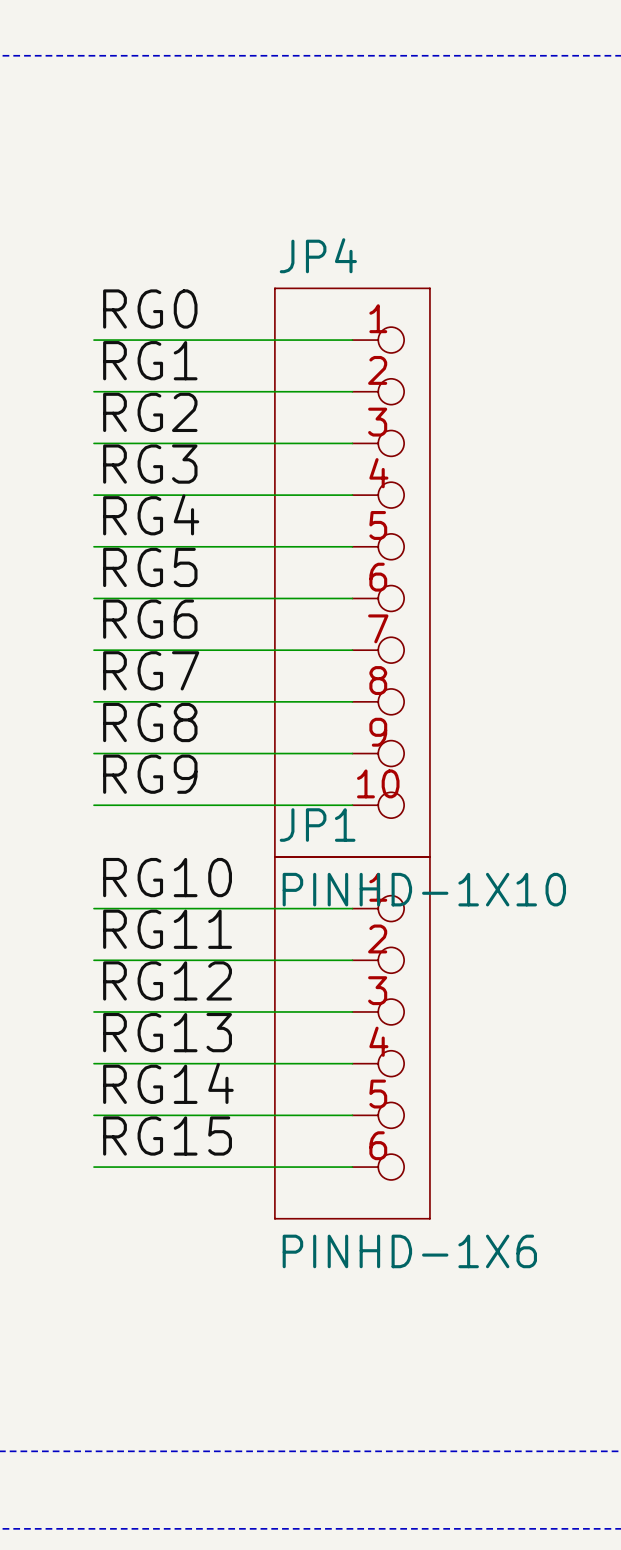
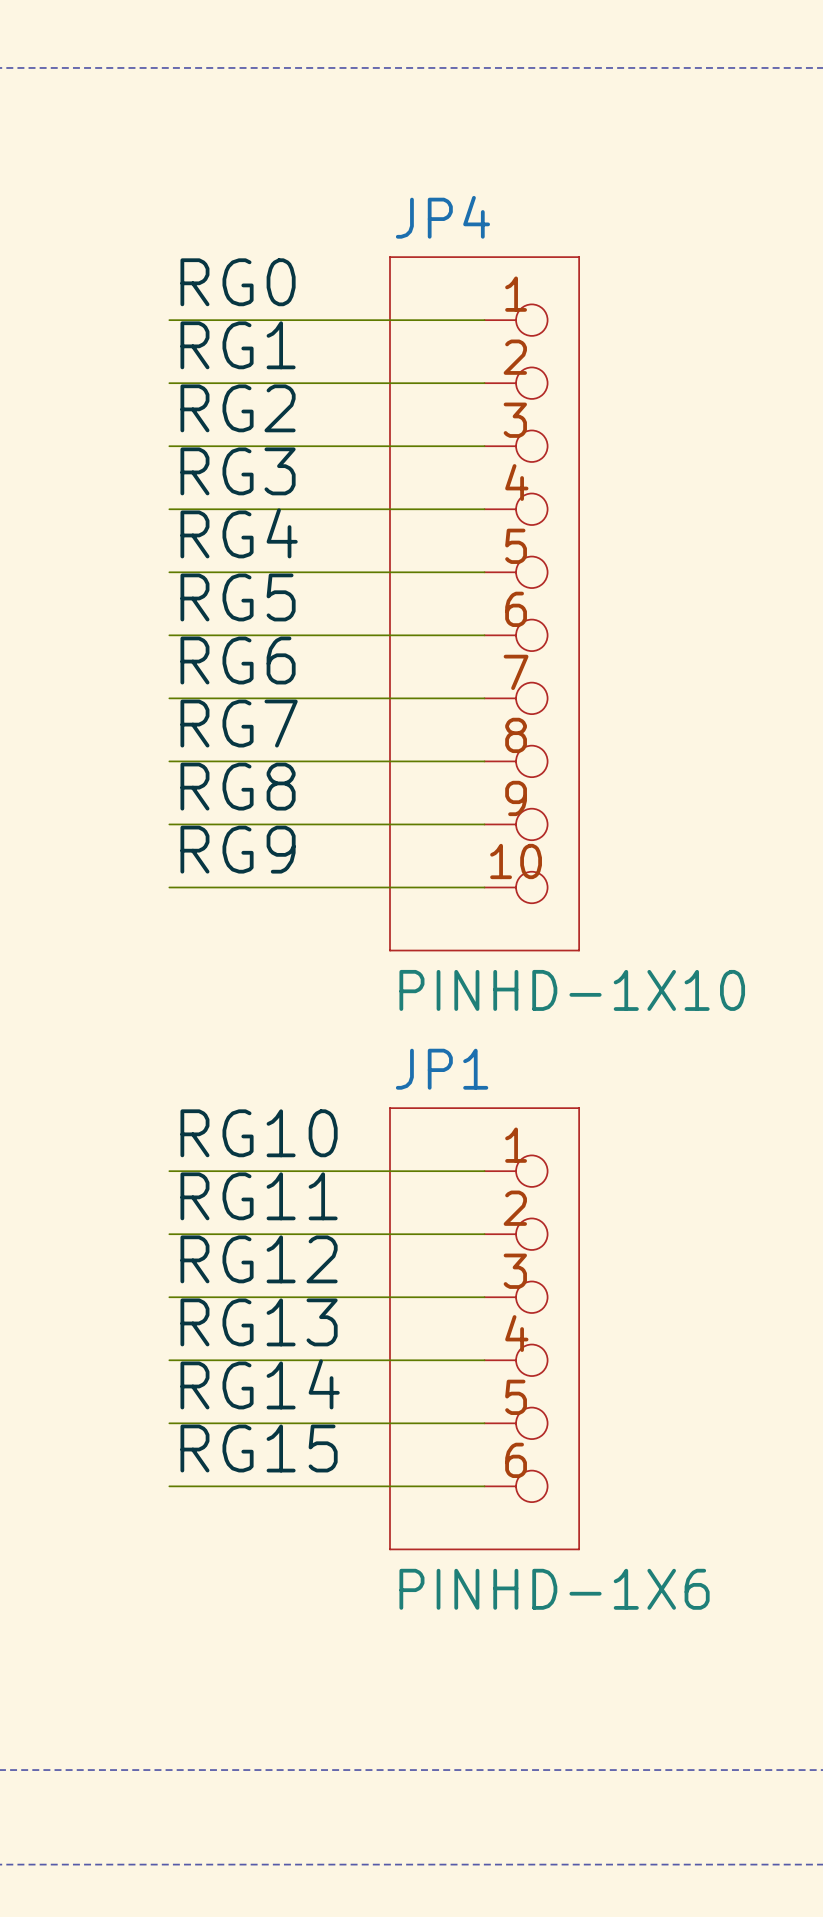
label position: RG0 (150, 309) -> RG0 (238, 282)
wire: (94, 340) (352, 340) -> (169, 320) (484, 320)
label position: RG1 (150, 360) -> RG1 (238, 345)
wire: (94, 391) (352, 391) -> (169, 383) (484, 383)
label position: RG2 (150, 412) -> RG2 (238, 408)
wire: (94, 443) (352, 443) -> (169, 446) (484, 446)
label position: RG3 (150, 464) -> RG3 (238, 471)
wire: (94, 495) (352, 495) -> (169, 509) (484, 509)
label position: RG4 (151, 514) -> RG4 (239, 533)
wire: (94, 546) (352, 546) -> (169, 572) (484, 572)
label position: RG5 (150, 567) -> RG5 (238, 597)
JP4 position: (352, 572) -> (484, 603)
wire: (94, 598) (352, 598) -> (169, 635) (484, 635)
label position: RG6 (150, 619) -> RG6 (238, 660)
wire: (94, 650) (352, 650) -> (169, 698) (484, 698)
label position: RG7 (151, 670) -> RG7 (239, 723)
wire: (94, 701) (352, 701) -> (169, 761) (484, 761)
label position: RG8 (150, 722) -> RG8 (238, 786)
wire: (94, 753) (352, 753) -> (169, 824) (484, 824)
label position: RG9 (150, 774) -> RG9 (238, 849)
wire: (94, 805) (352, 805) -> (169, 887) (484, 887)
label: RG10 (167, 877) -> none
wire: (94, 908) (352, 908) -> (169, 1486) (484, 1486)
label: RG11 (167, 929) -> RG10 (259, 1133)
label: RG12 (167, 980) -> RG11 (259, 1196)
label: RG13 (167, 1032) -> RG12 (259, 1259)
JP1 position: (352, 1037) -> (484, 1328)
label: RG14 (168, 1083) -> RG13 (259, 1322)
label: RG15 (167, 1136) -> RG14 (260, 1384)
label: none -> RG15 (259, 1448)

